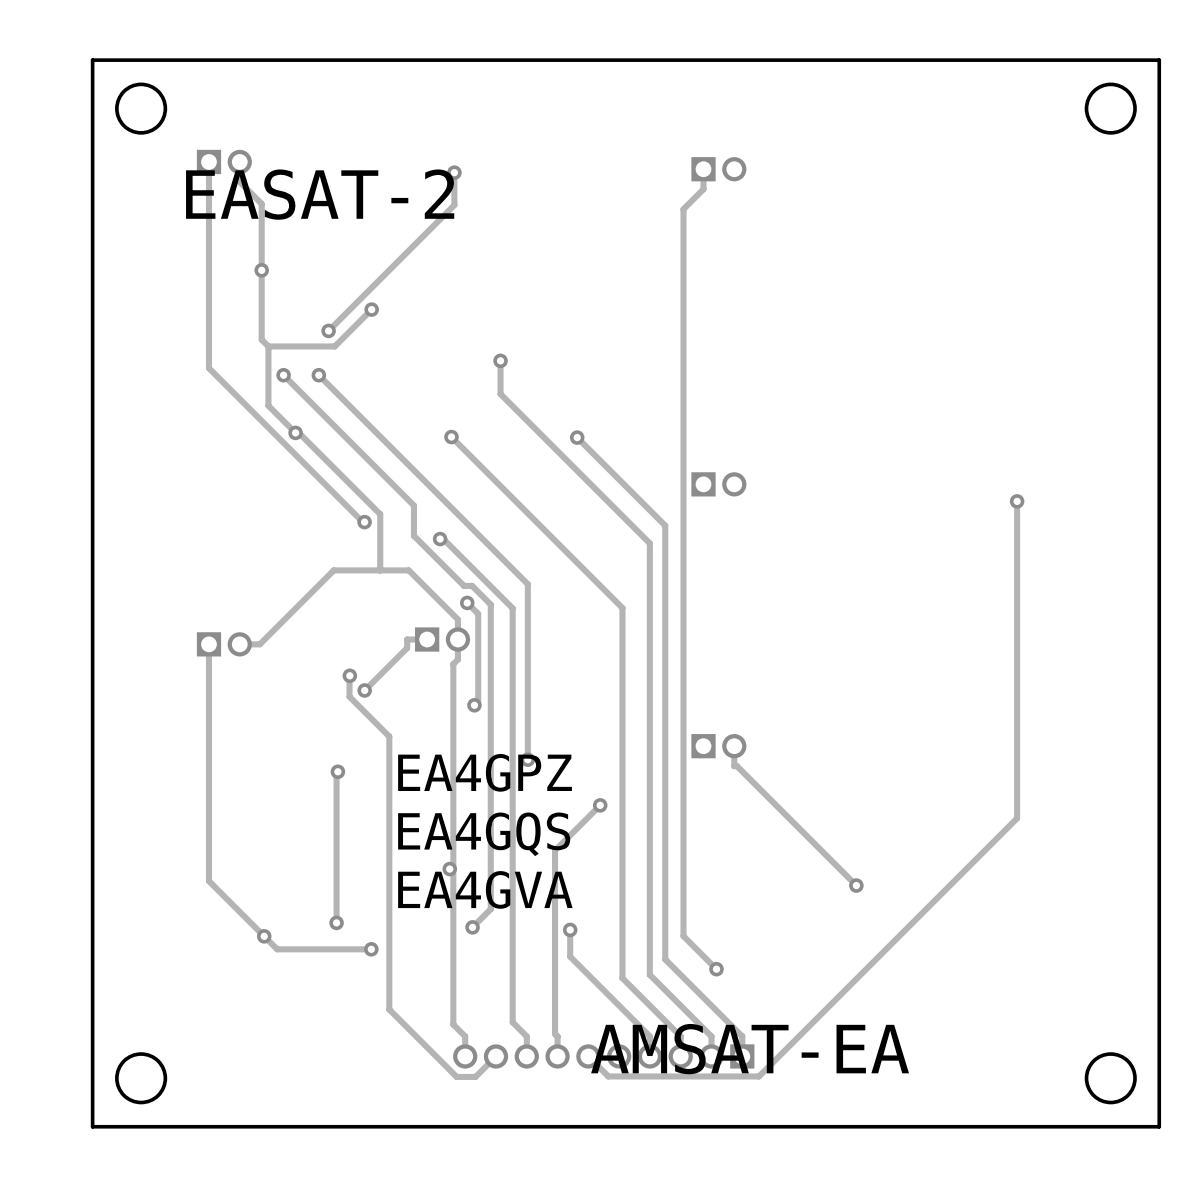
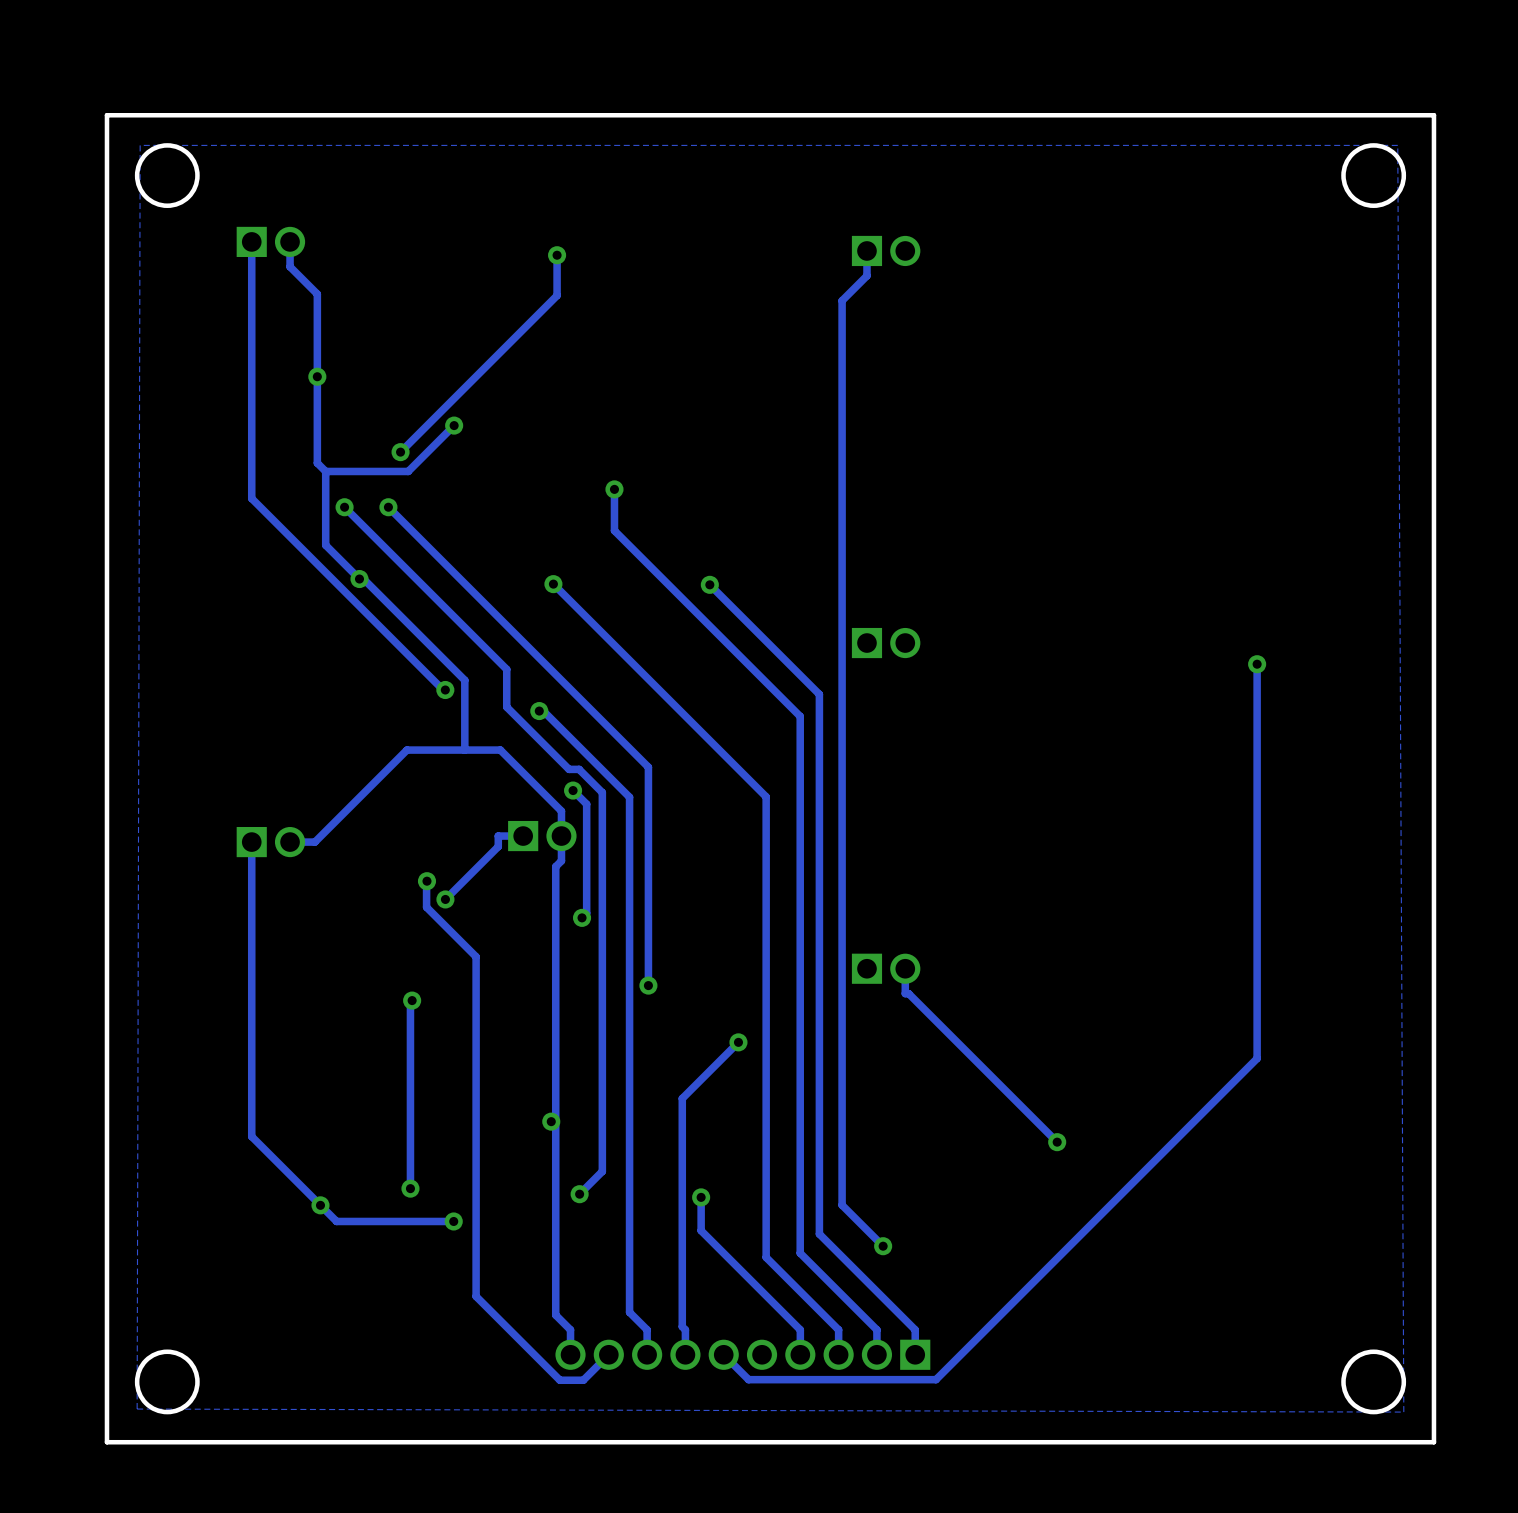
zone outline: none -> (1397, 145) (140, 145) (137, 1409) (1403, 1412) (1397, 145)
text: EASAT-2 (320, 194) -> none
text: EA4GPZ (485, 772) -> none
text: EA4GQS (484, 834) -> none
text: EA4GVA (485, 889) -> none
text: AMSAT-EA (750, 1049) -> none

